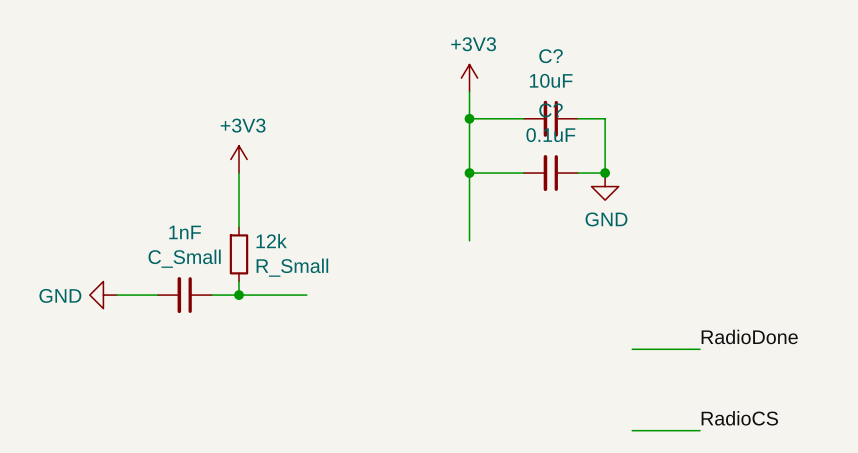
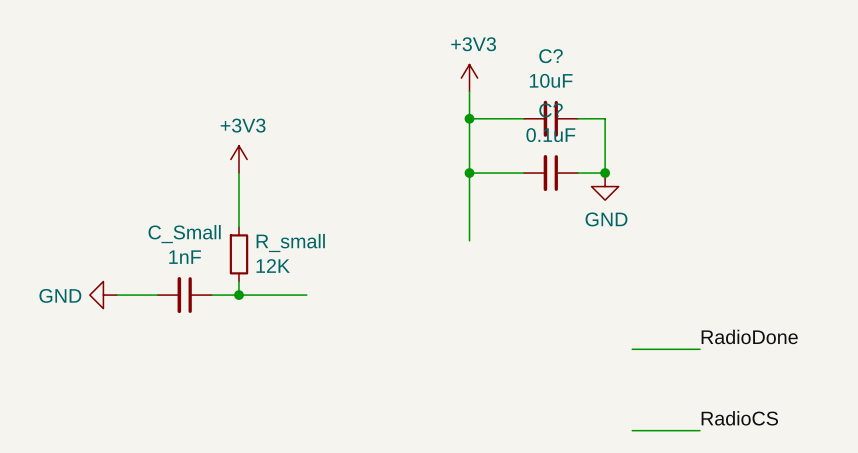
1nF name: 1nF (185, 232) -> C_Small (184, 234)
12k name: 12k (271, 241) -> R_small (290, 243)
1nF value: C_Small (184, 258) -> 1nF (185, 257)
12k value: R_Small (292, 267) -> 12K (273, 265)

